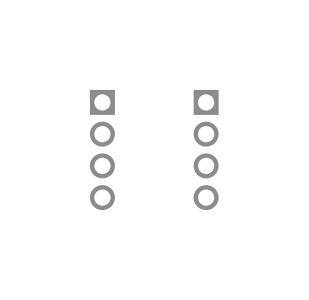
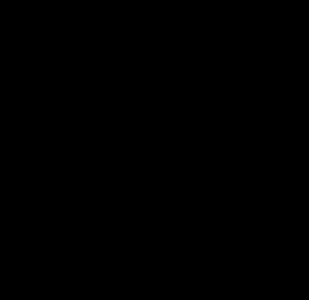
part: (102, 150) -> none
part: (206, 150) -> none

